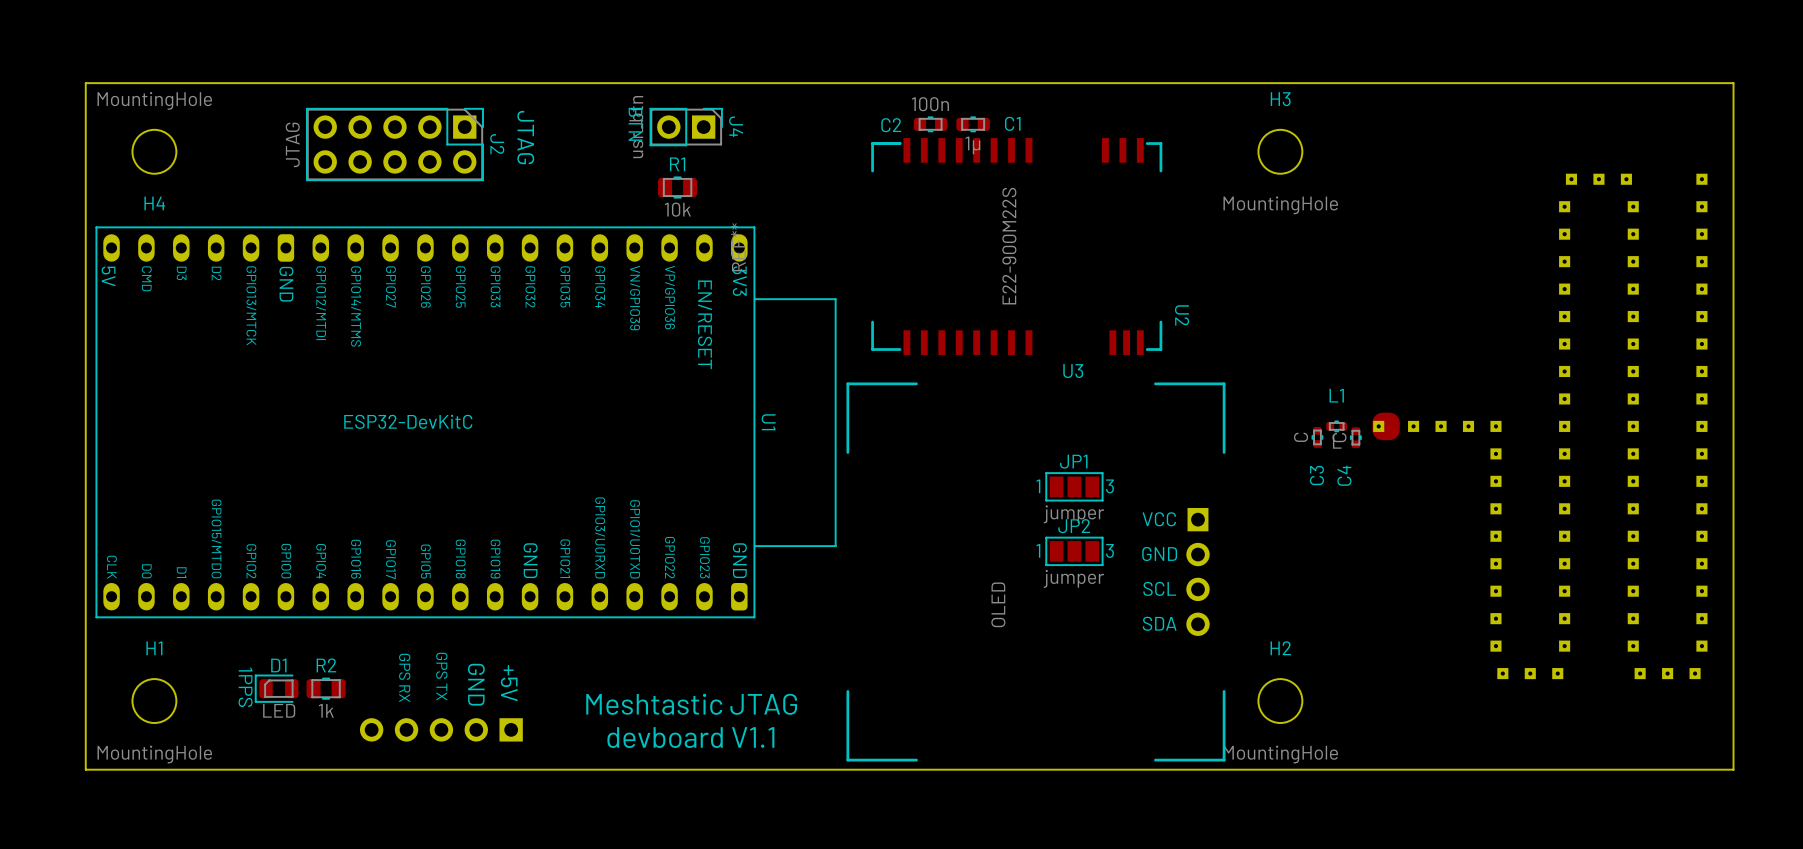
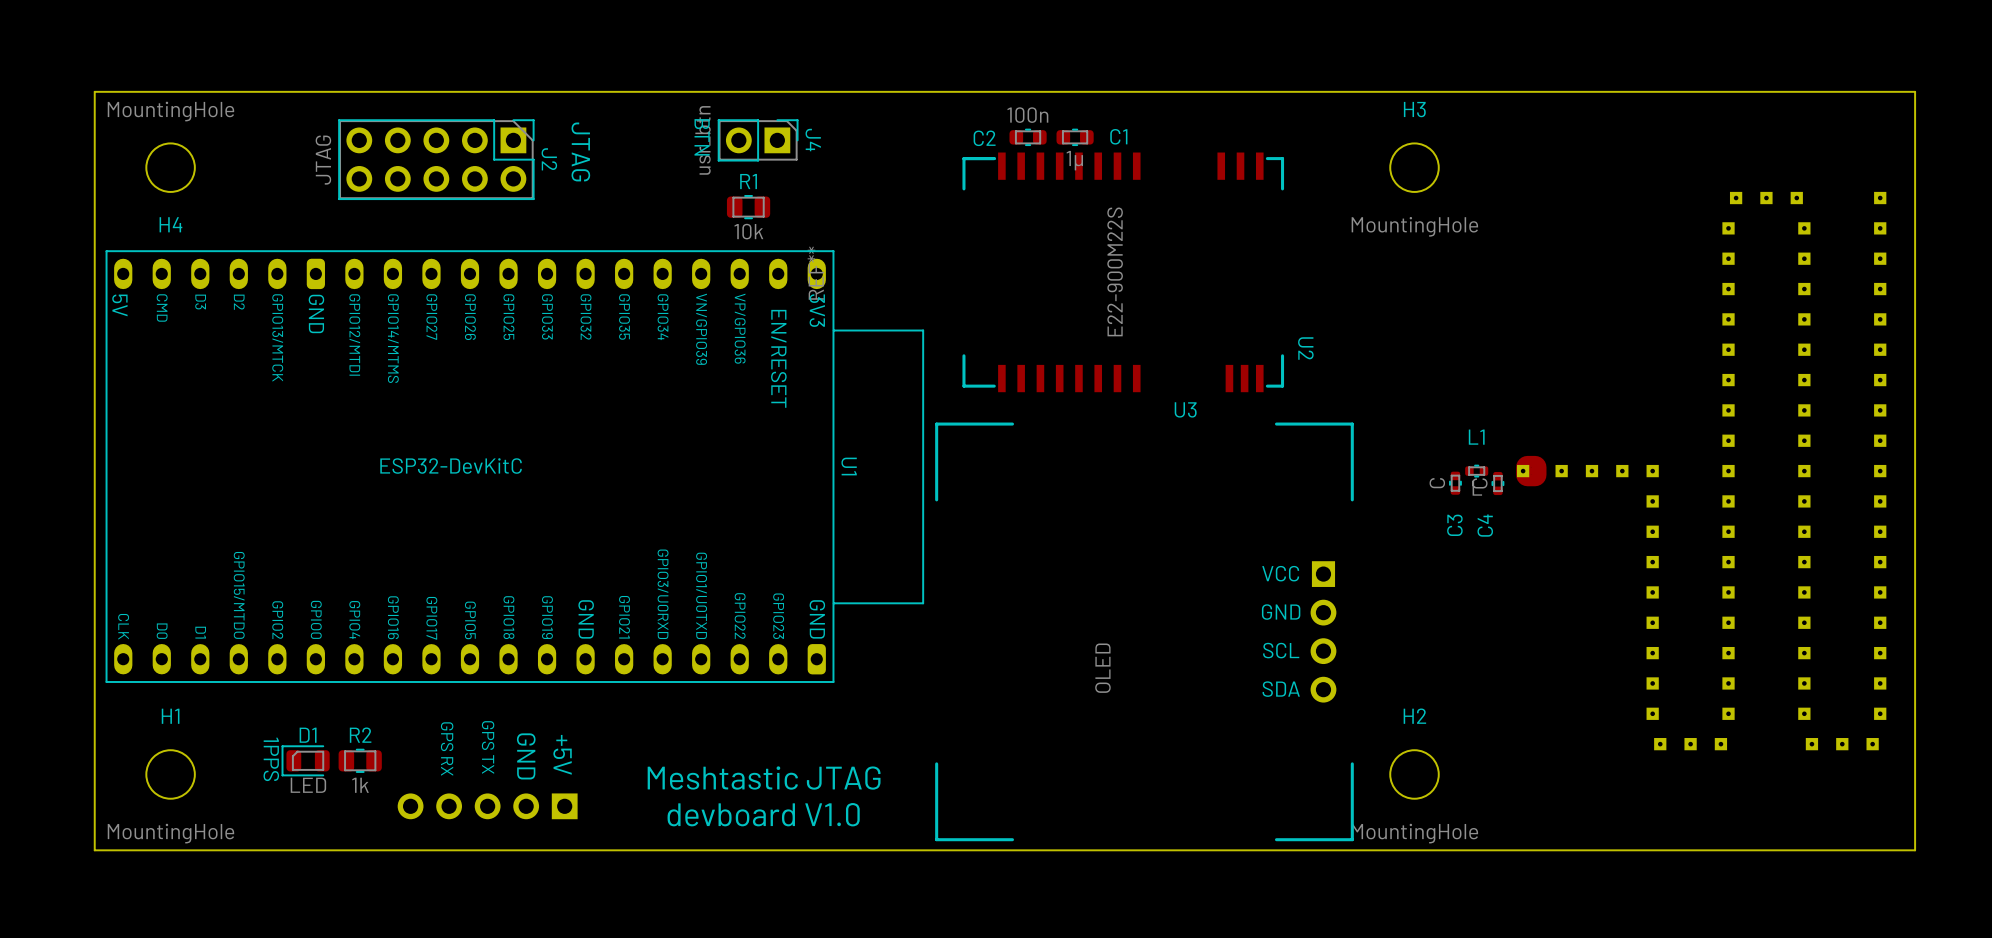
JP1: jumper (1074, 486) -> none
JP2: jumper (1074, 551) -> none
text: devboard V1.1 (690, 737) -> devboard V1.0 (763, 814)

